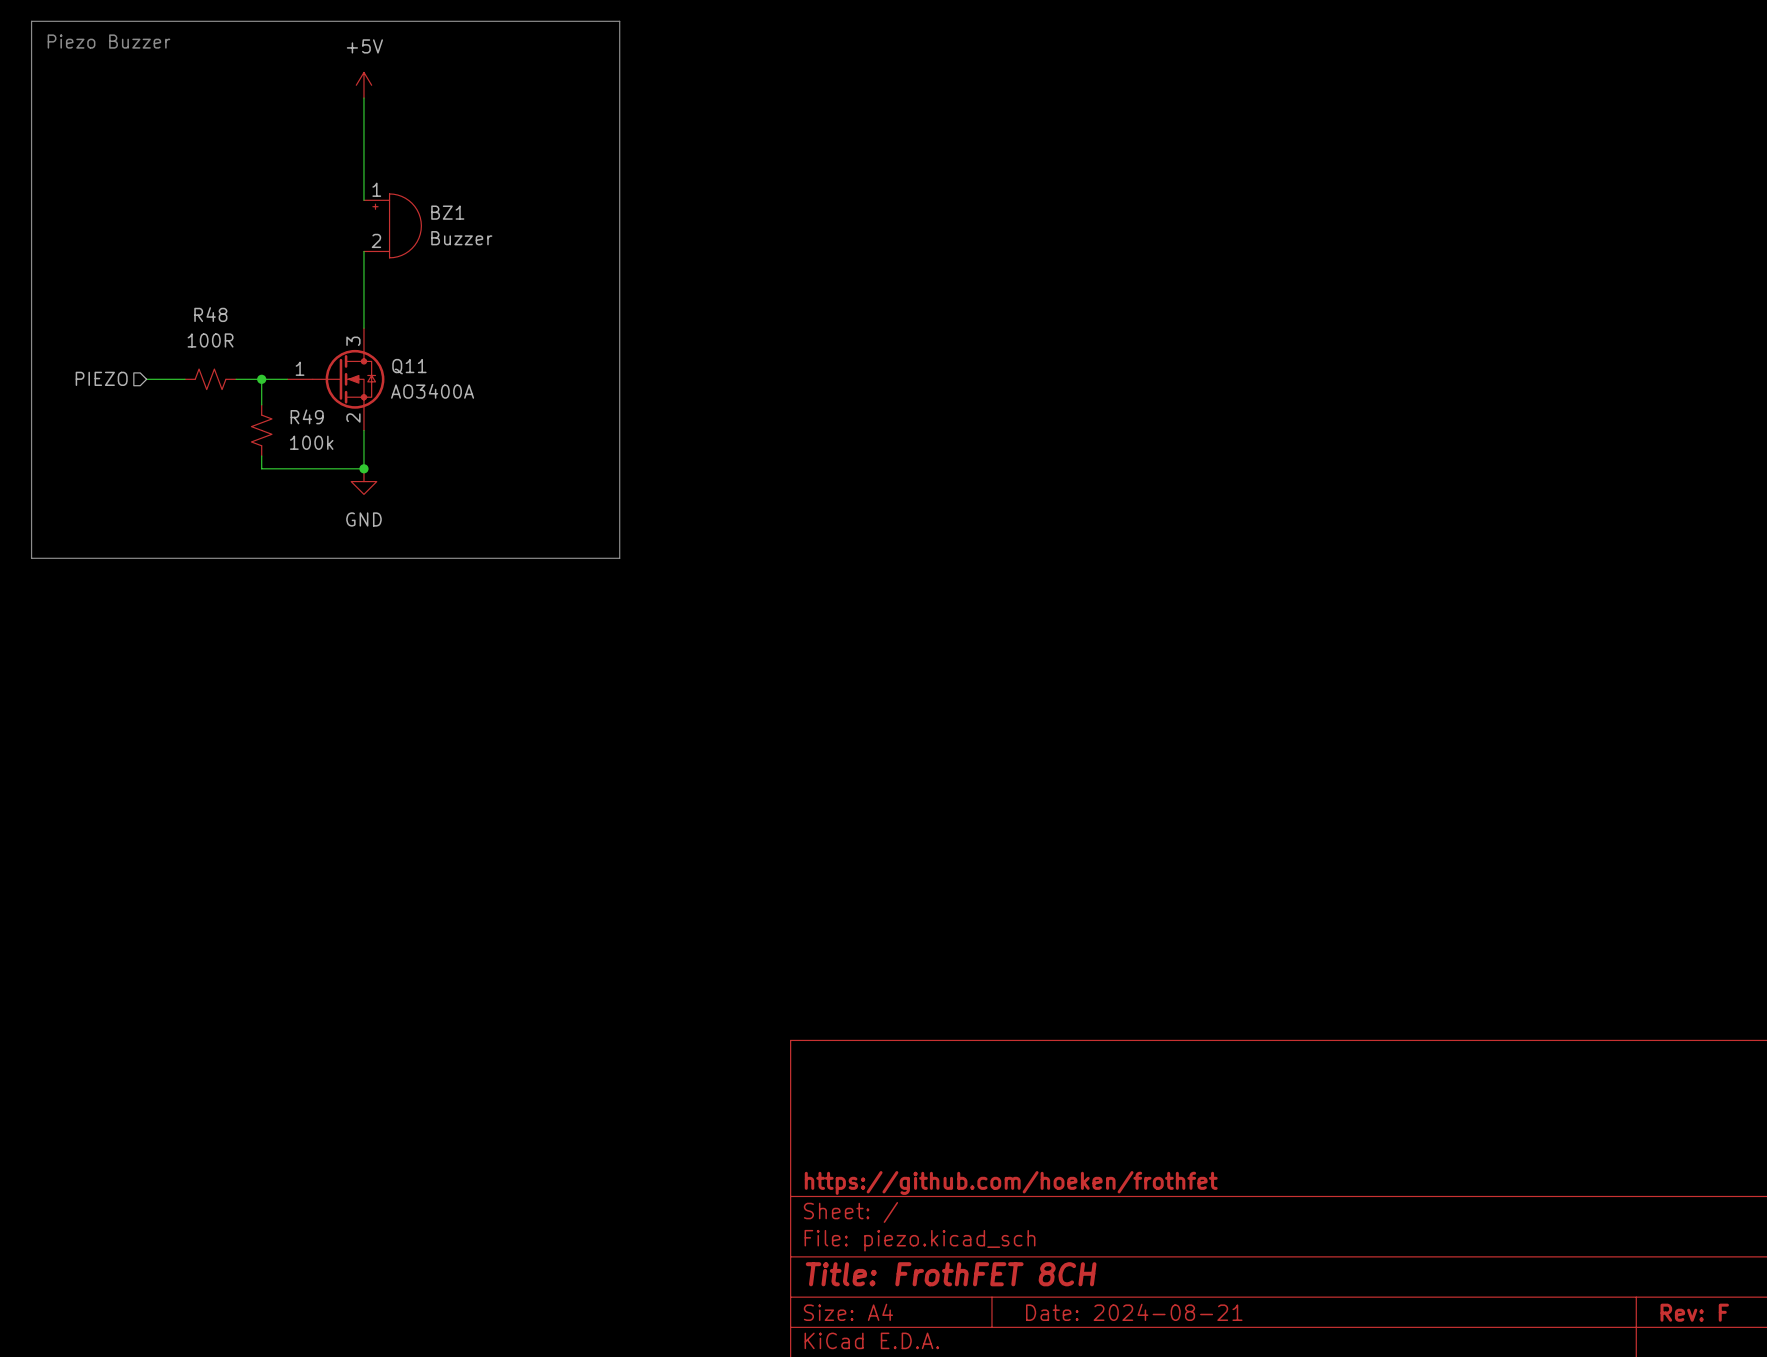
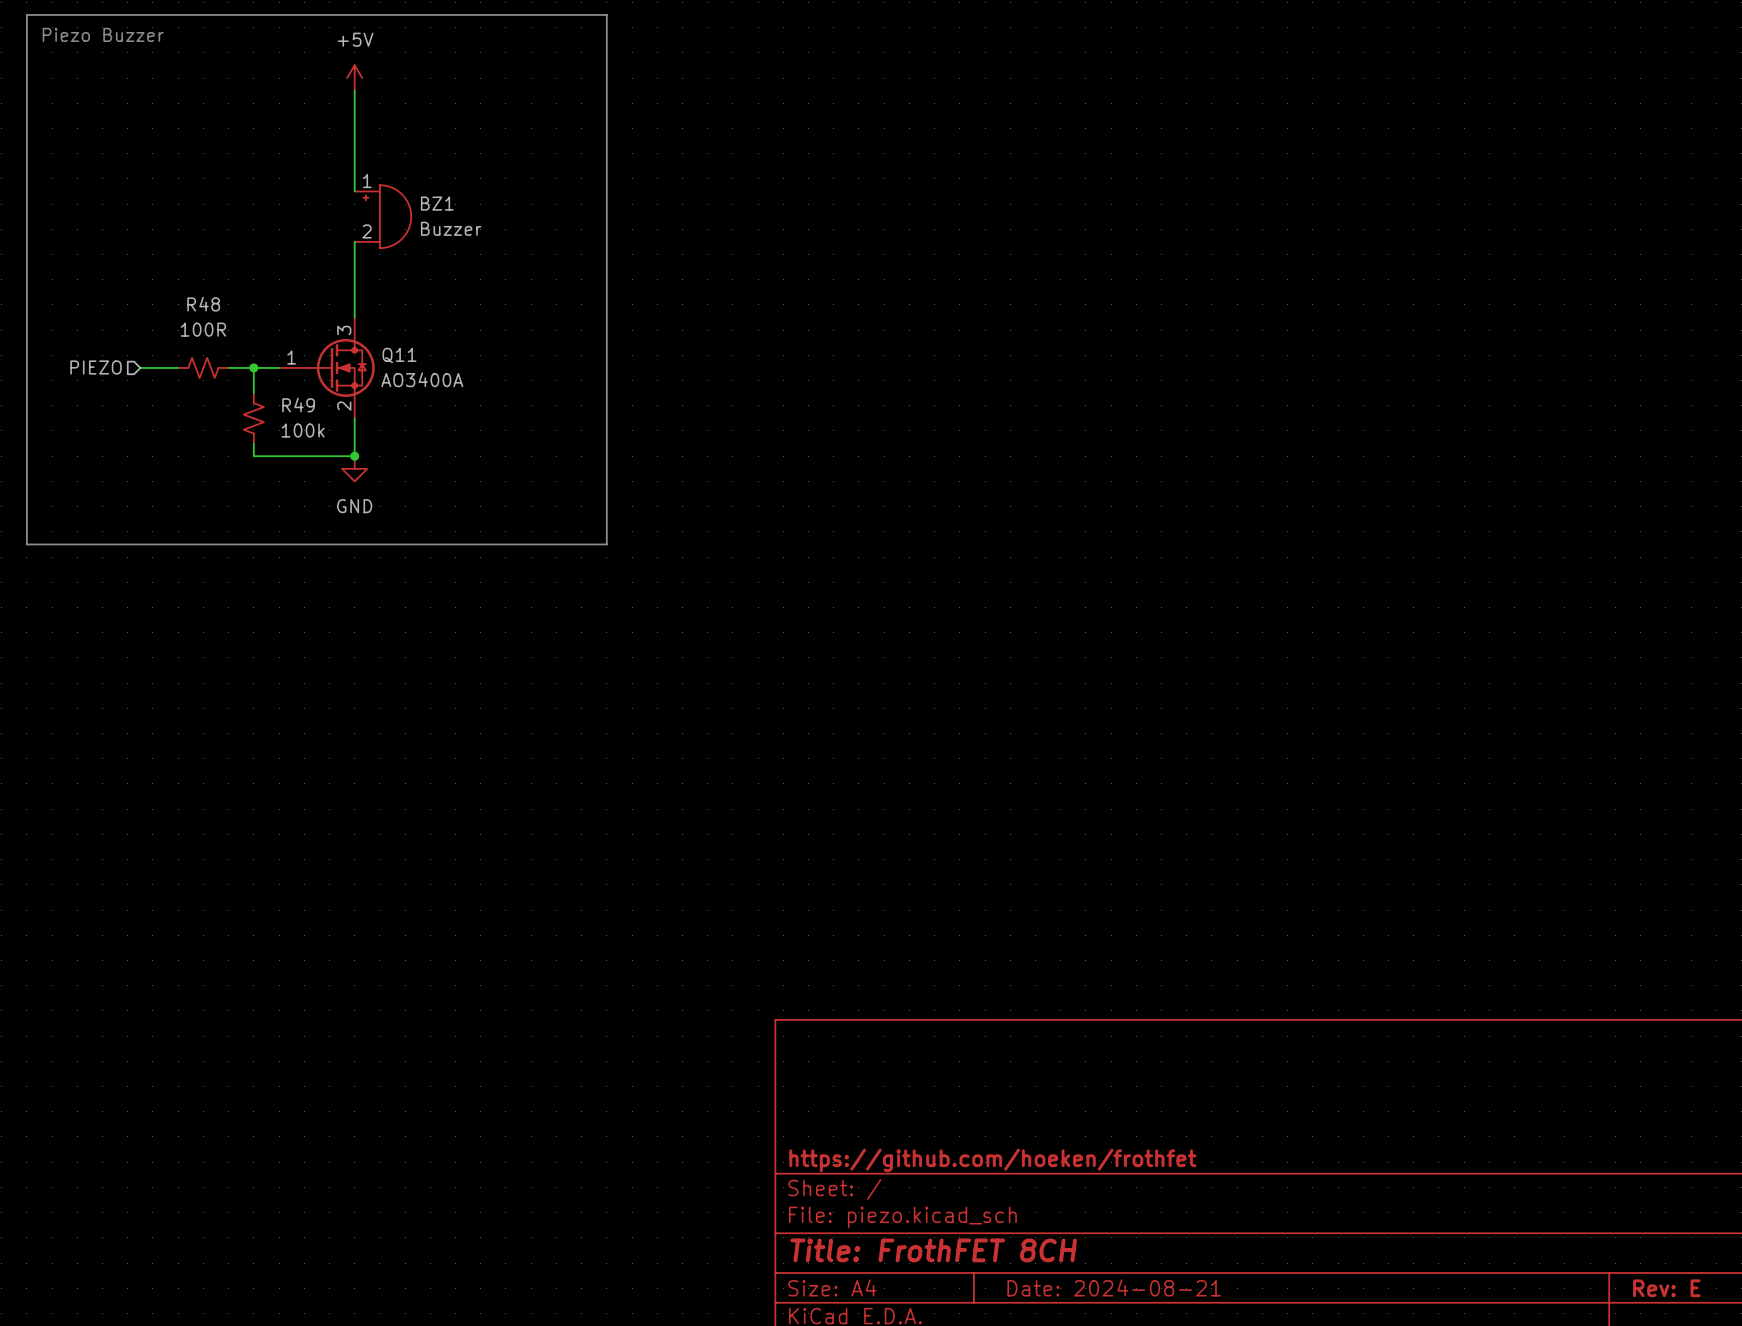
title block: Rev: F (1694, 1312) -> Rev: E (1666, 1288)

